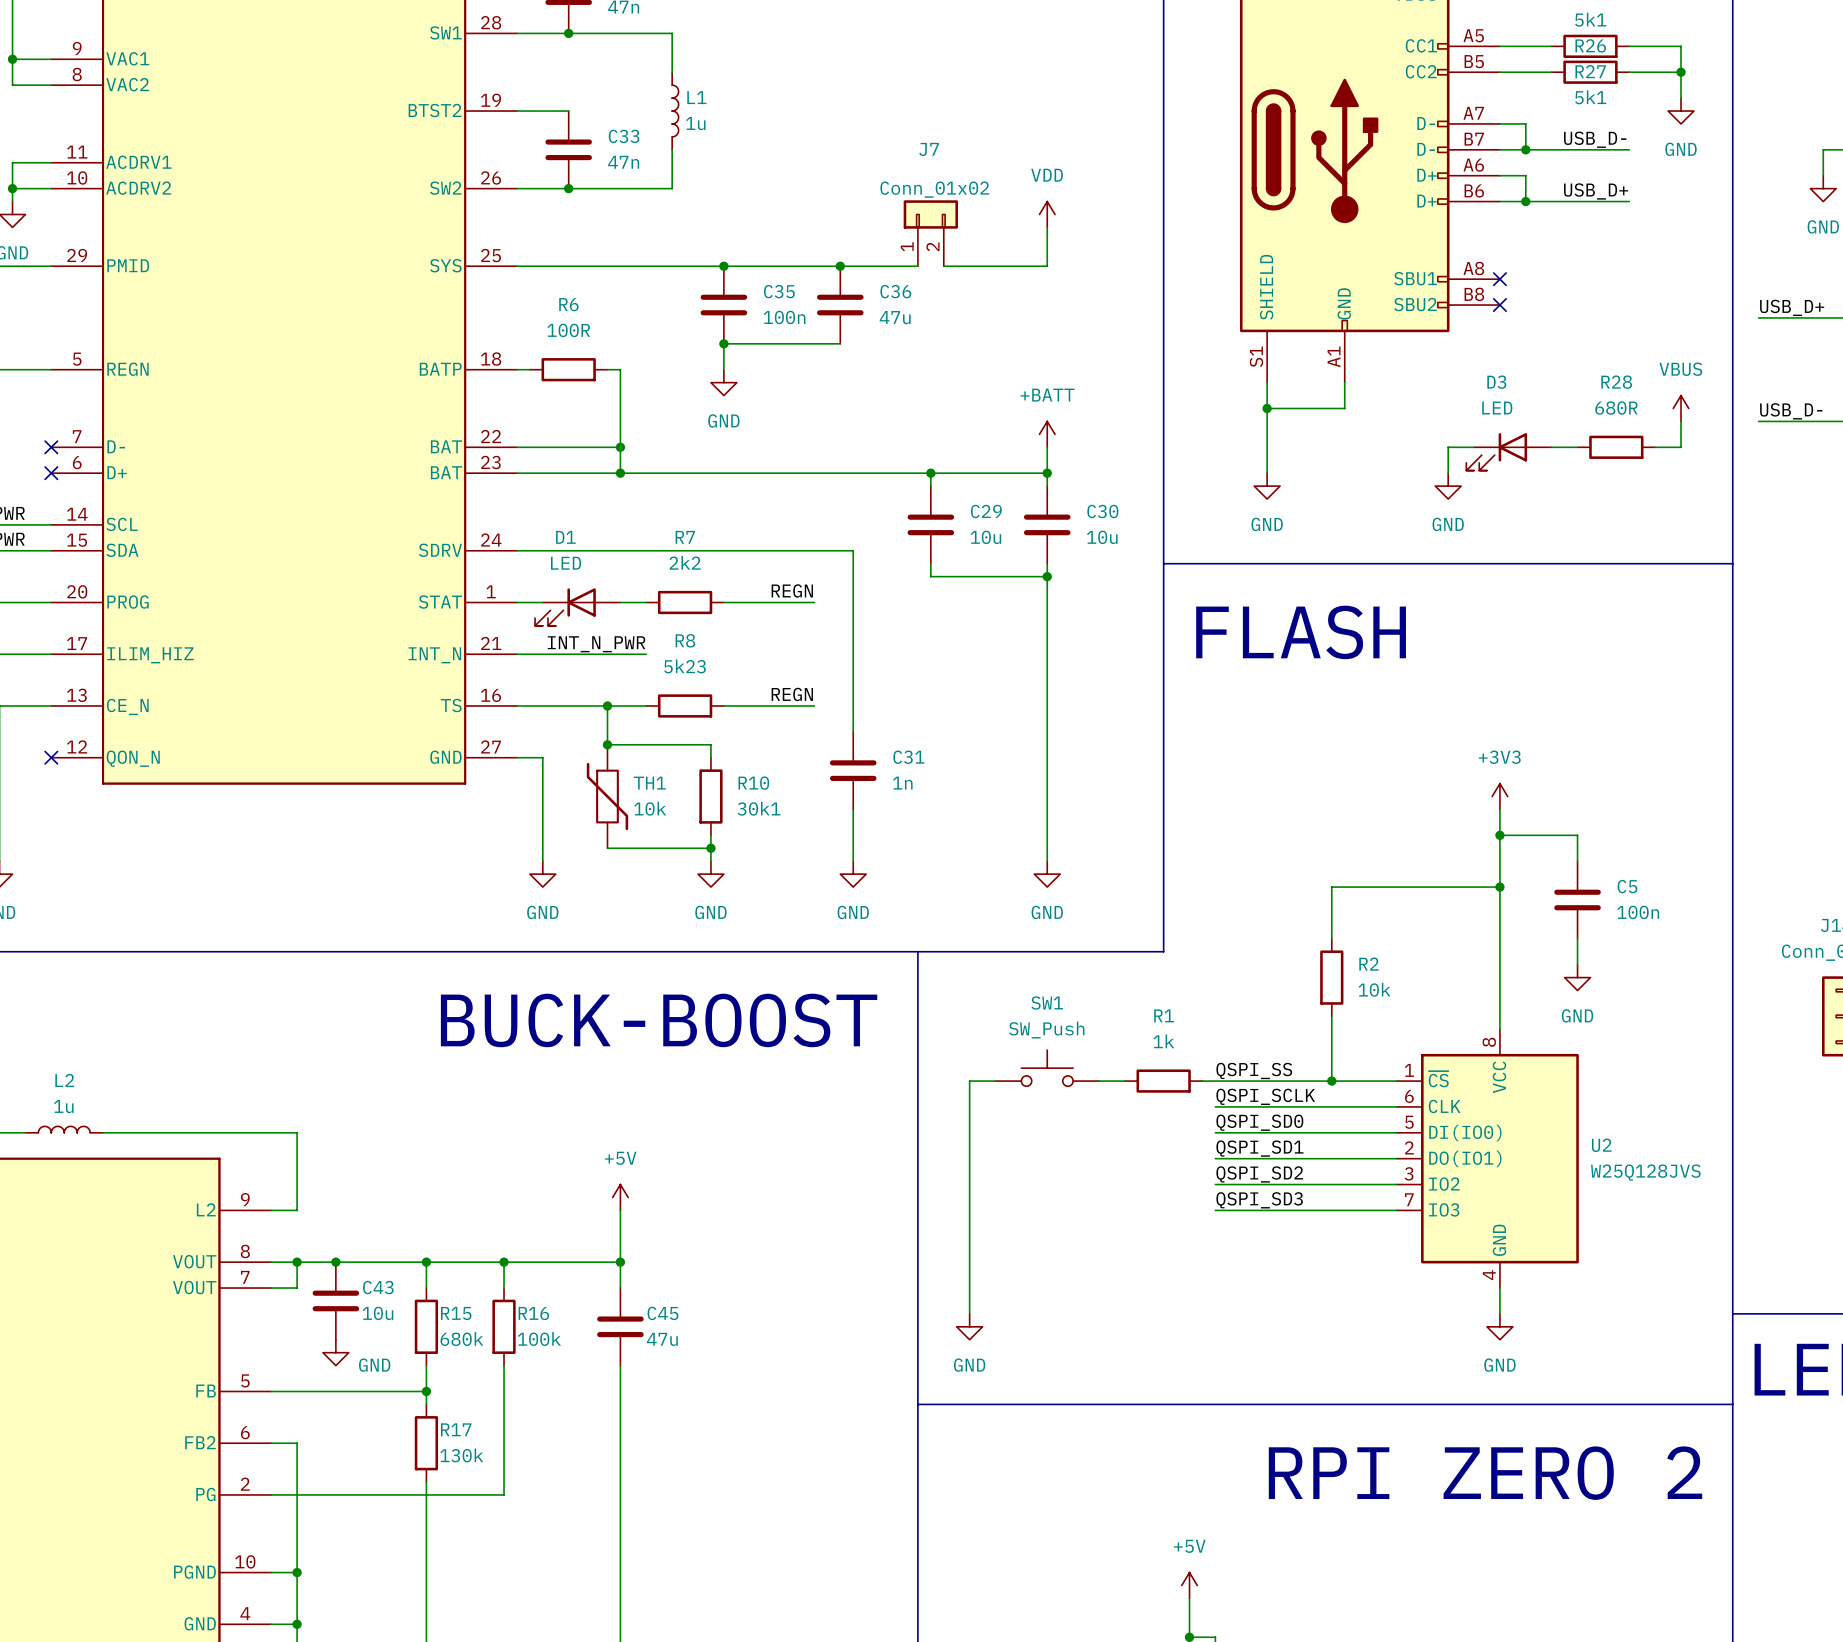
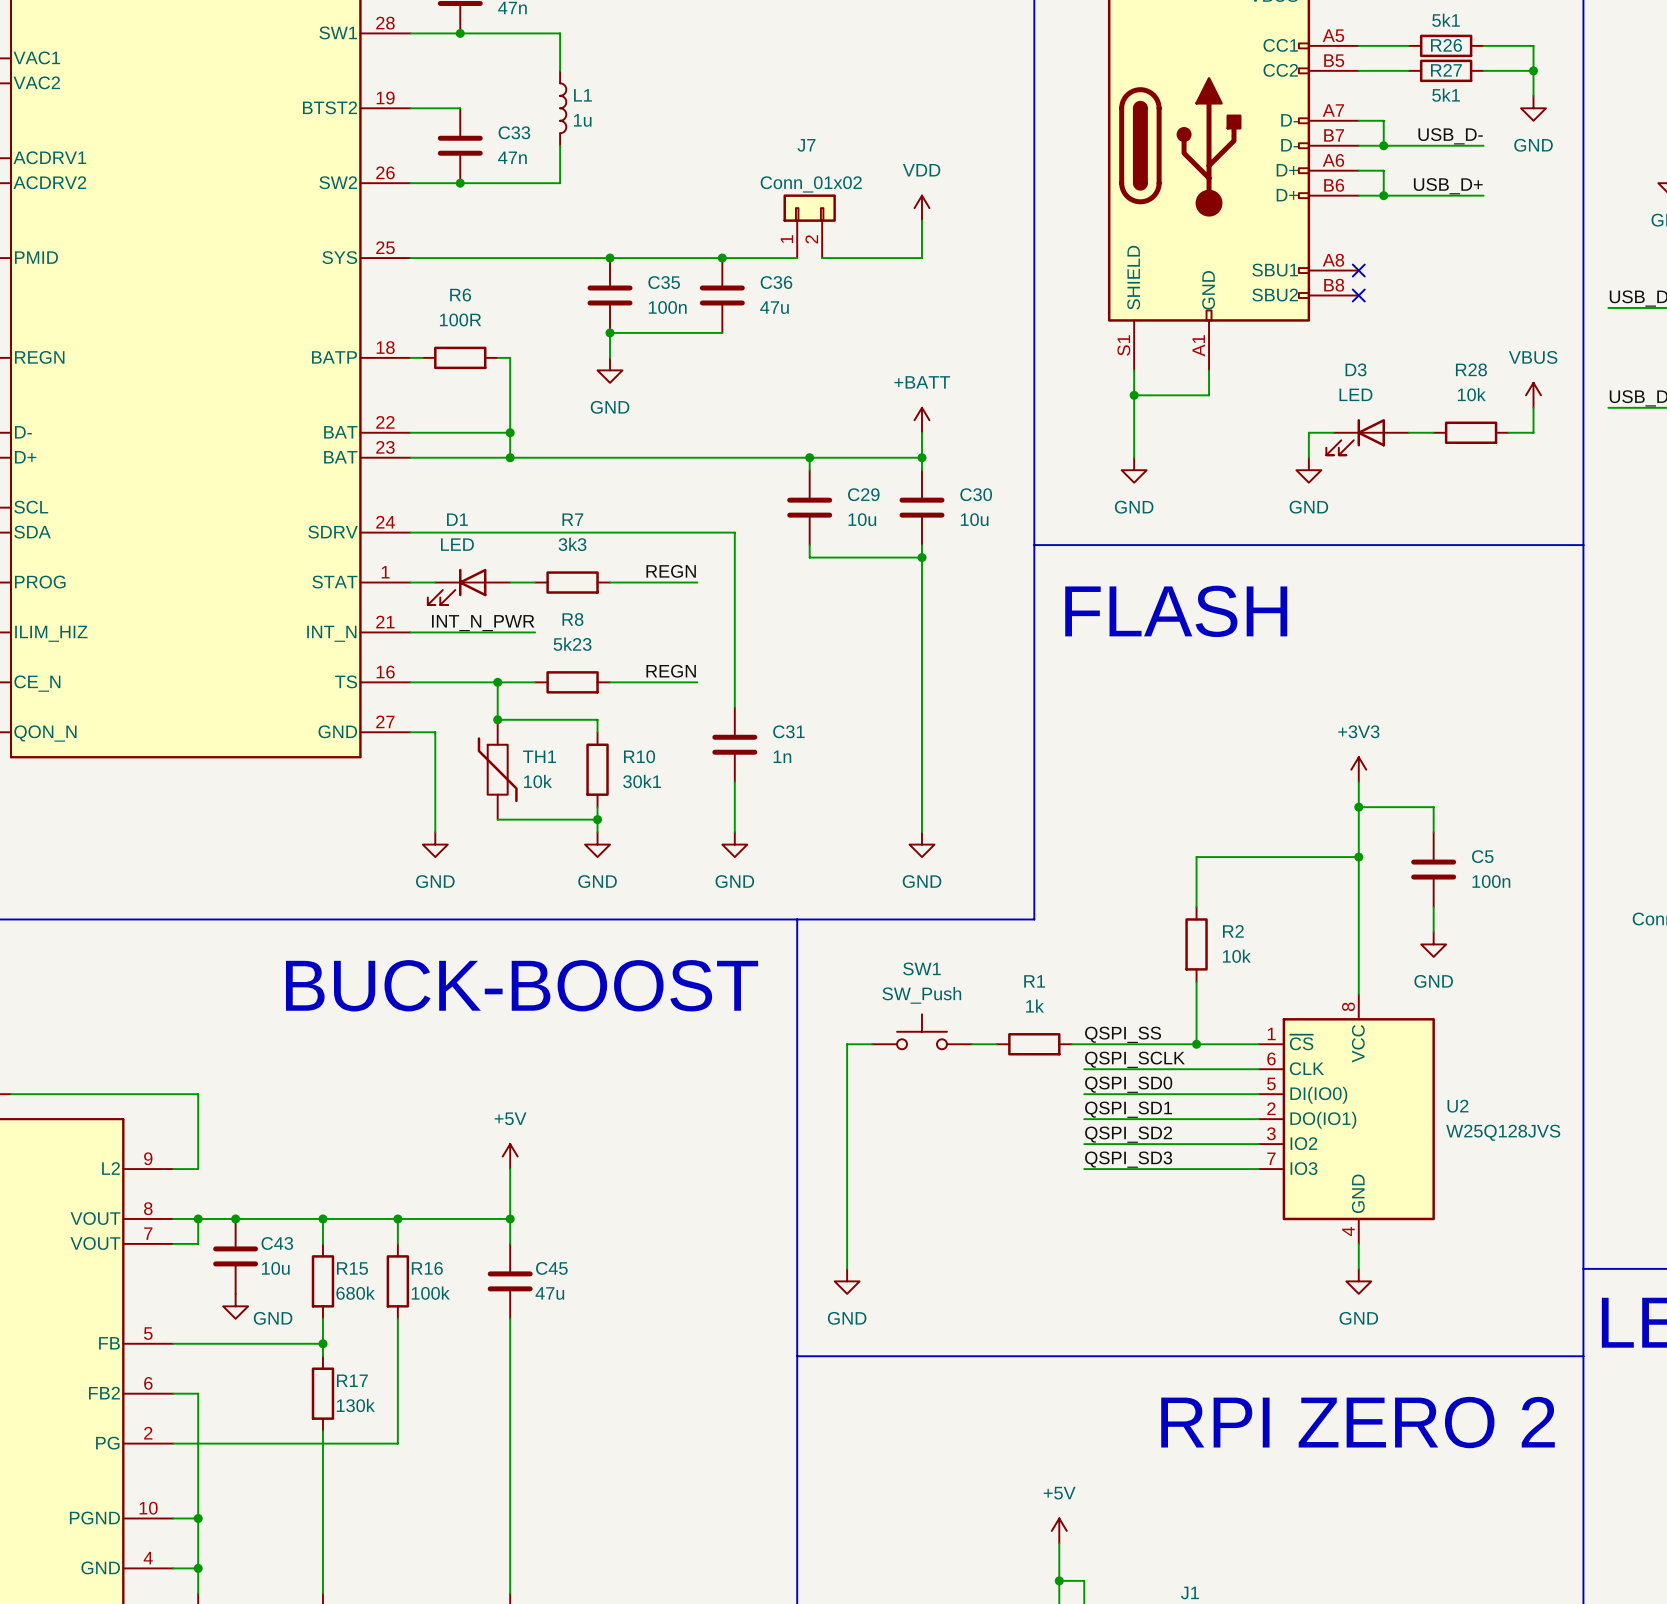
R28 value: 680R (1616, 408) -> 10k (1471, 394)
R7 value: 2k2 (685, 562) -> 3k3 (572, 544)

